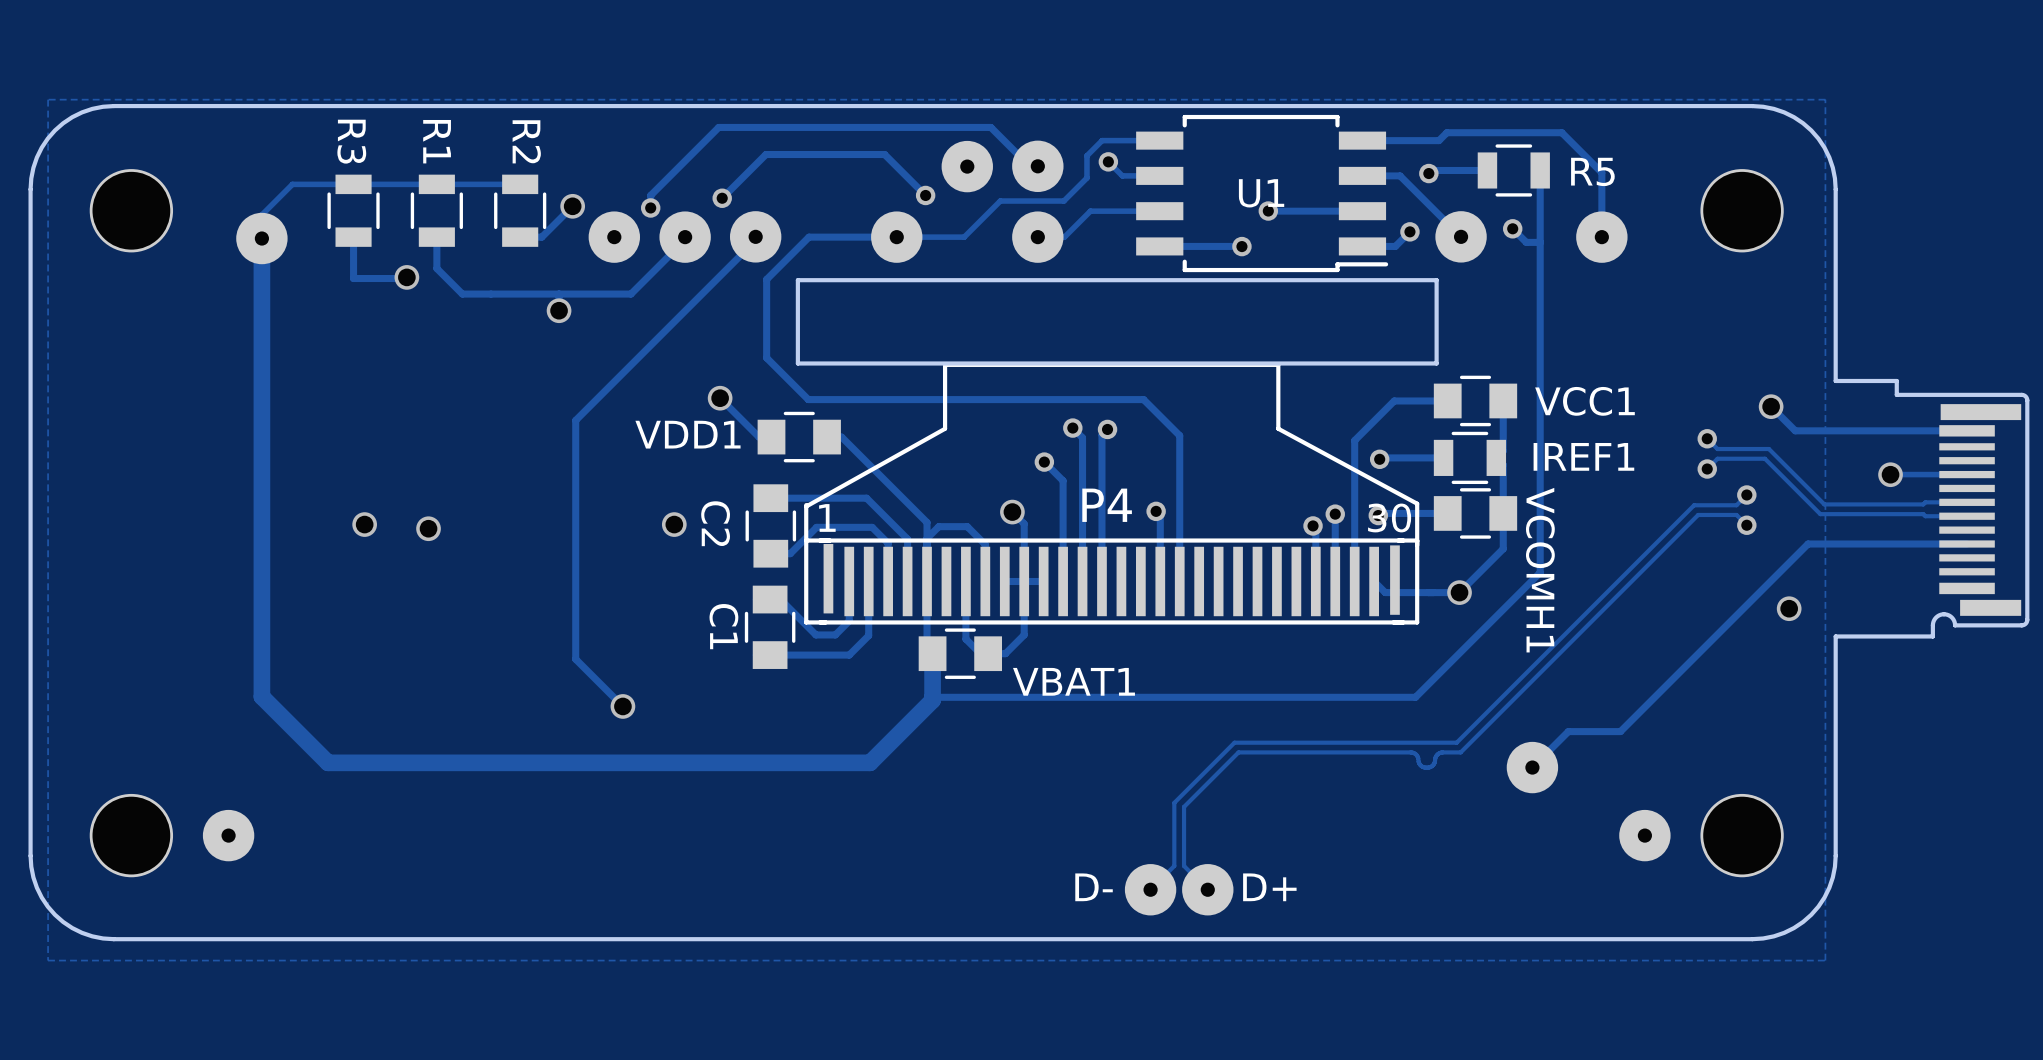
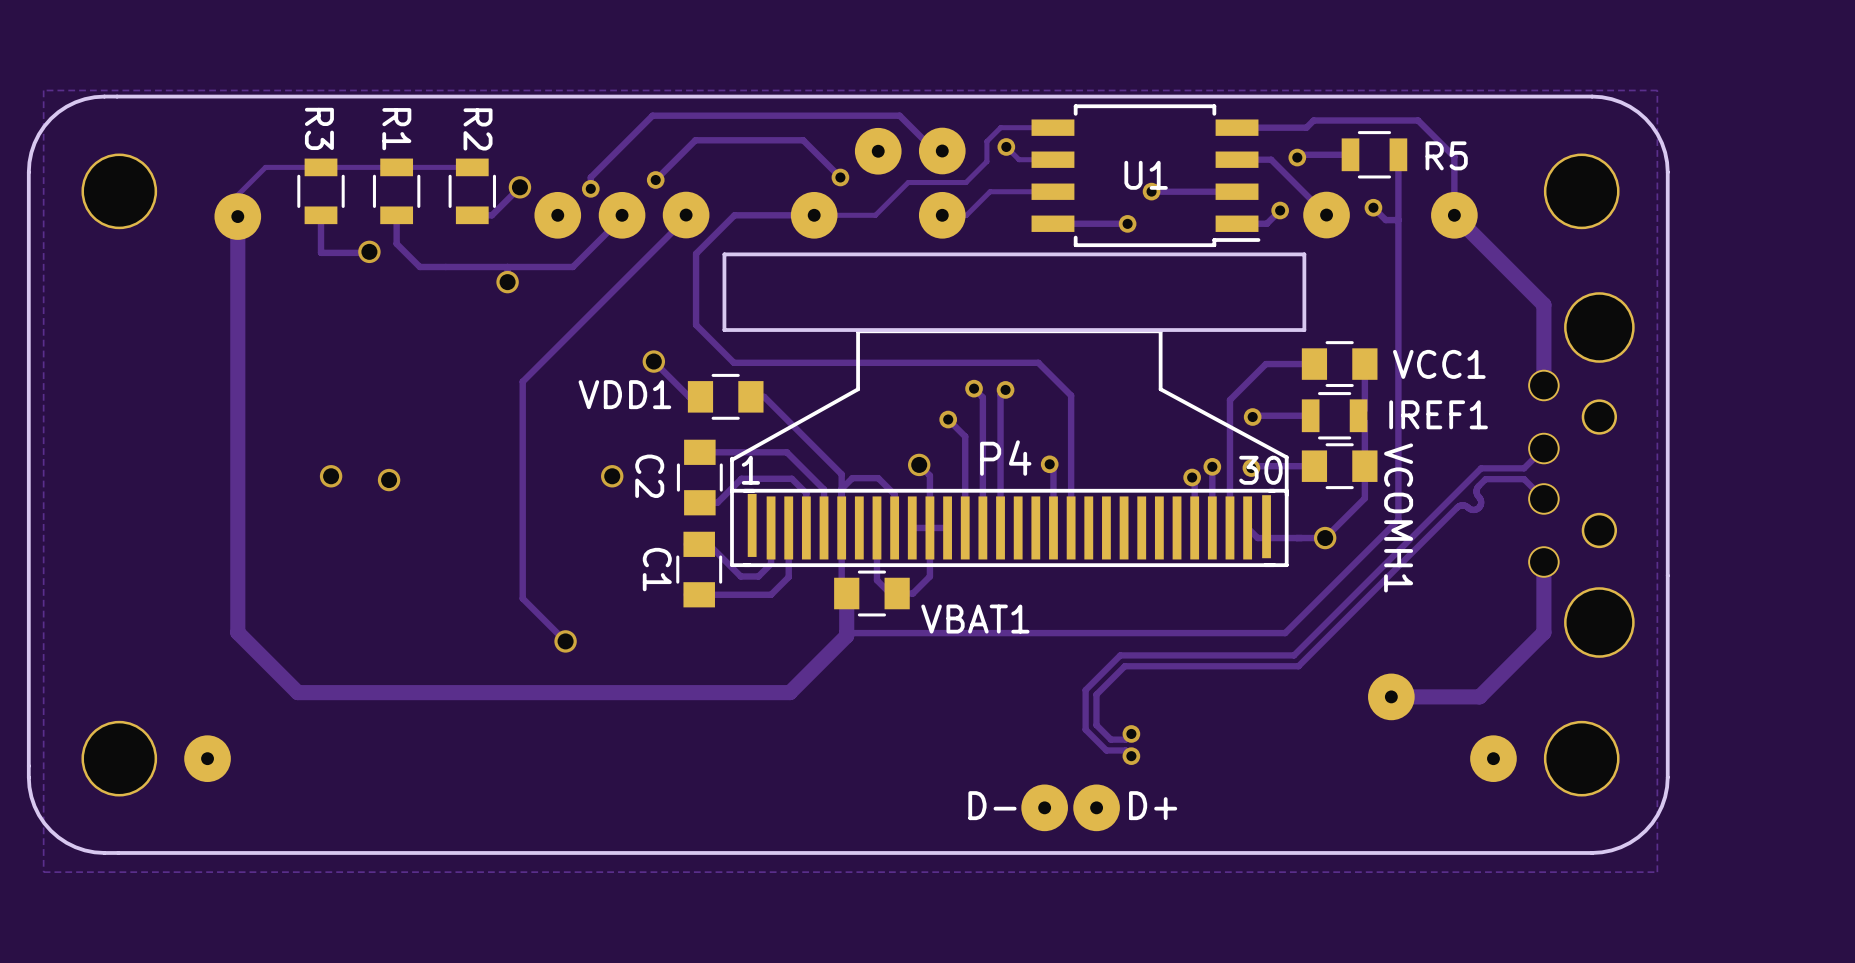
board edge: (1752, 106) (113, 106) (82, 112) (63, 123) (41, 147) (33, 167) (30, 189) (30, 855) (36, 887) (47, 906) (63, 921) (82, 932) (113, 939) (1752, 939) (1784, 932) (1803, 921) (1818, 906) (1829, 887) (1834, 866) (1835, 636) (1932, 636) (1933, 621) (1942, 614) (1951, 617) (1955, 625) (2021, 625) (2026, 621) (2027, 400) (2025, 396) (2021, 394) (1896, 394) (1896, 380) (1835, 380) (1835, 189) (1832, 167) (1818, 138) (1803, 123) (1773, 108) (1752, 106) -> (1592, 96) (1621, 102) (1645, 118) (1661, 143) (1667, 172) (1667, 787) (1661, 806) (1652, 823) (1638, 837) (1621, 847) (1592, 852) (104, 852) (84, 850) (66, 842) (44, 823) (34, 806) (28, 777) (28, 172) (34, 143) (44, 126) (58, 112) (75, 102) (104, 96) (1592, 96)
track: none -> (1454, 215) (1543, 304) (1543, 385)
track: (1771, 406) (1795, 430) (1967, 430) -> none
via: (1771, 406) -> none
track: (1707, 438) (1717, 449) (1768, 449) (1824, 504) (1967, 502) -> none
via: (1707, 438) -> none
track: (1707, 469) (1717, 458) (1764, 458) (1820, 514) (1967, 516) -> none
via: (1707, 469) -> none
via: (1890, 474) -> none
track: (1967, 474) (1890, 474) -> none
track: none -> (1543, 448) (1524, 468) (1481, 468) (1294, 655) (1120, 655) (1085, 690) (1085, 729) (1106, 750) (1125, 750) (1131, 756)
track: (1746, 495) (1736, 505) (1694, 505) (1456, 742) (1234, 742) (1174, 802) (1174, 866) (1150, 889) -> none
via: (1746, 495) -> none
part: (1980, 509) -> none
part: none -> (1581, 475)
track: (1746, 525) (1736, 514) (1698, 514) (1460, 752) (1439, 753) (1430, 766) (1421, 766) (1416, 755) (1410, 752) (1238, 752) (1184, 806) (1184, 866) (1207, 889) -> none
via: (1746, 525) -> none
track: (1967, 544) (1808, 544) (1620, 731) (1568, 731) (1532, 767) -> (1543, 562) (1543, 632) (1479, 696) (1391, 696)
track: none -> (1478, 496) (1476, 488) (1485, 479) (1524, 479) (1543, 498)
track: none -> (1478, 497) (1481, 501) (1478, 507) (1474, 509) (1468, 507)
track: none -> (1467, 507) (1463, 505) (1457, 507) (1298, 666) (1124, 666) (1096, 694) (1096, 725) (1110, 739) (1125, 739) (1131, 733)
via: (1789, 608) -> none
via: none -> (1131, 733)
via: none -> (1131, 756)

